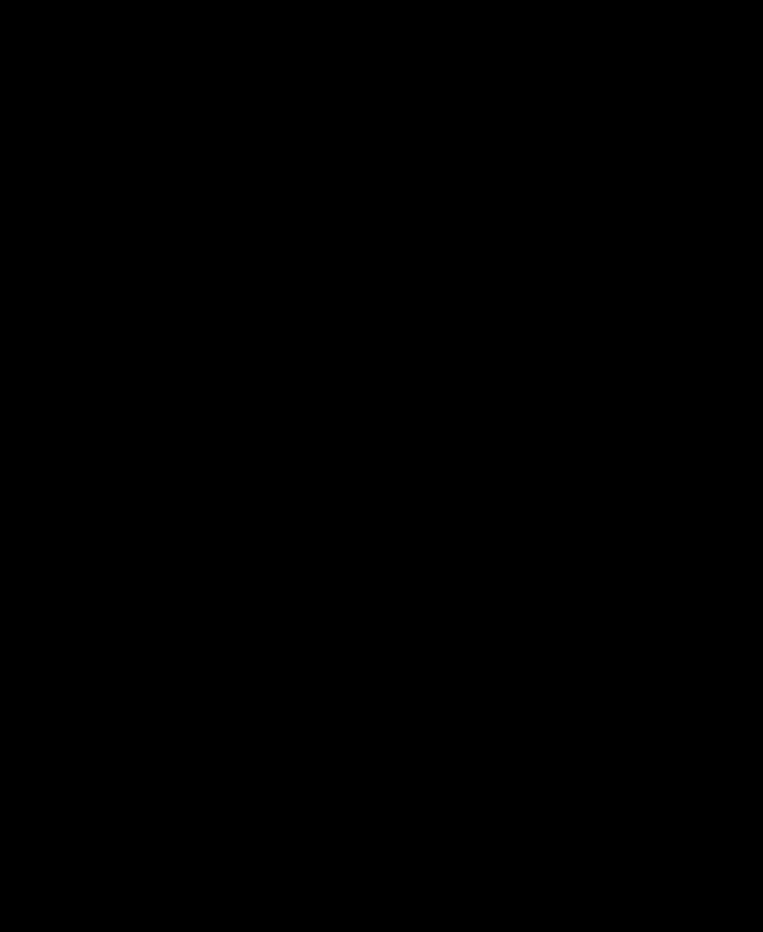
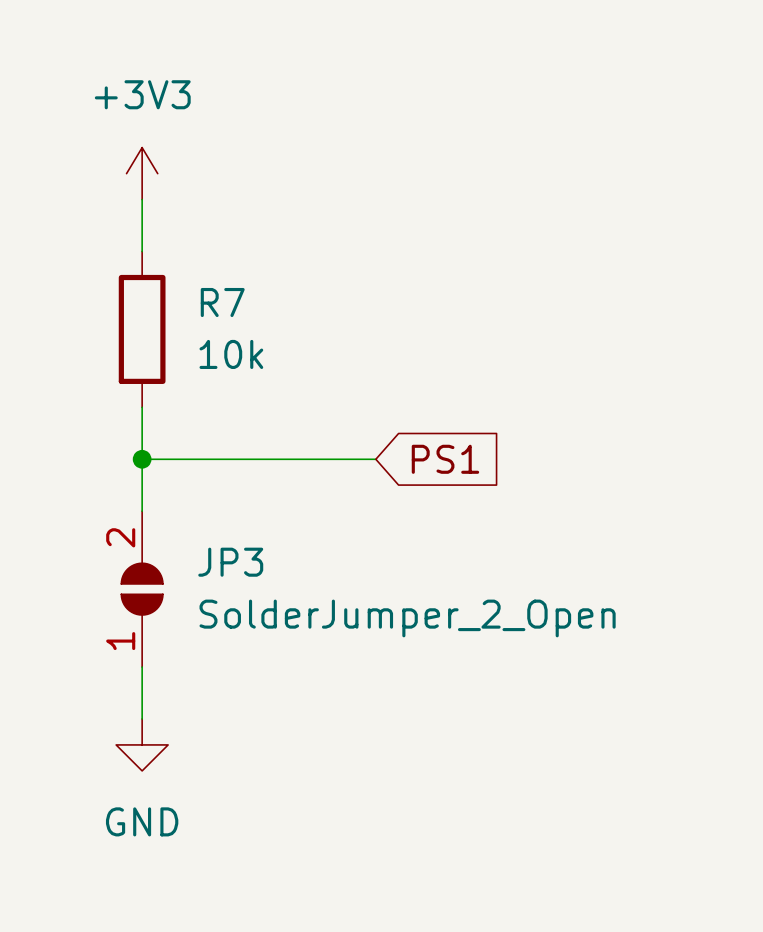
power symbol: none -> +3V3 (142, 173)
wire: none -> (142, 199) (142, 251)
R7: none -> 10k (142, 329)
wire: none -> (142, 407) (142, 511)
wire: none -> (142, 459) (375, 459)
junction: none -> (142, 459)
global label: none -> PS1 (445, 459)
JP3: none -> SolderJumper_2_Open (142, 589)
wire: none -> (142, 667) (142, 718)
power symbol: none -> GND (142, 744)

